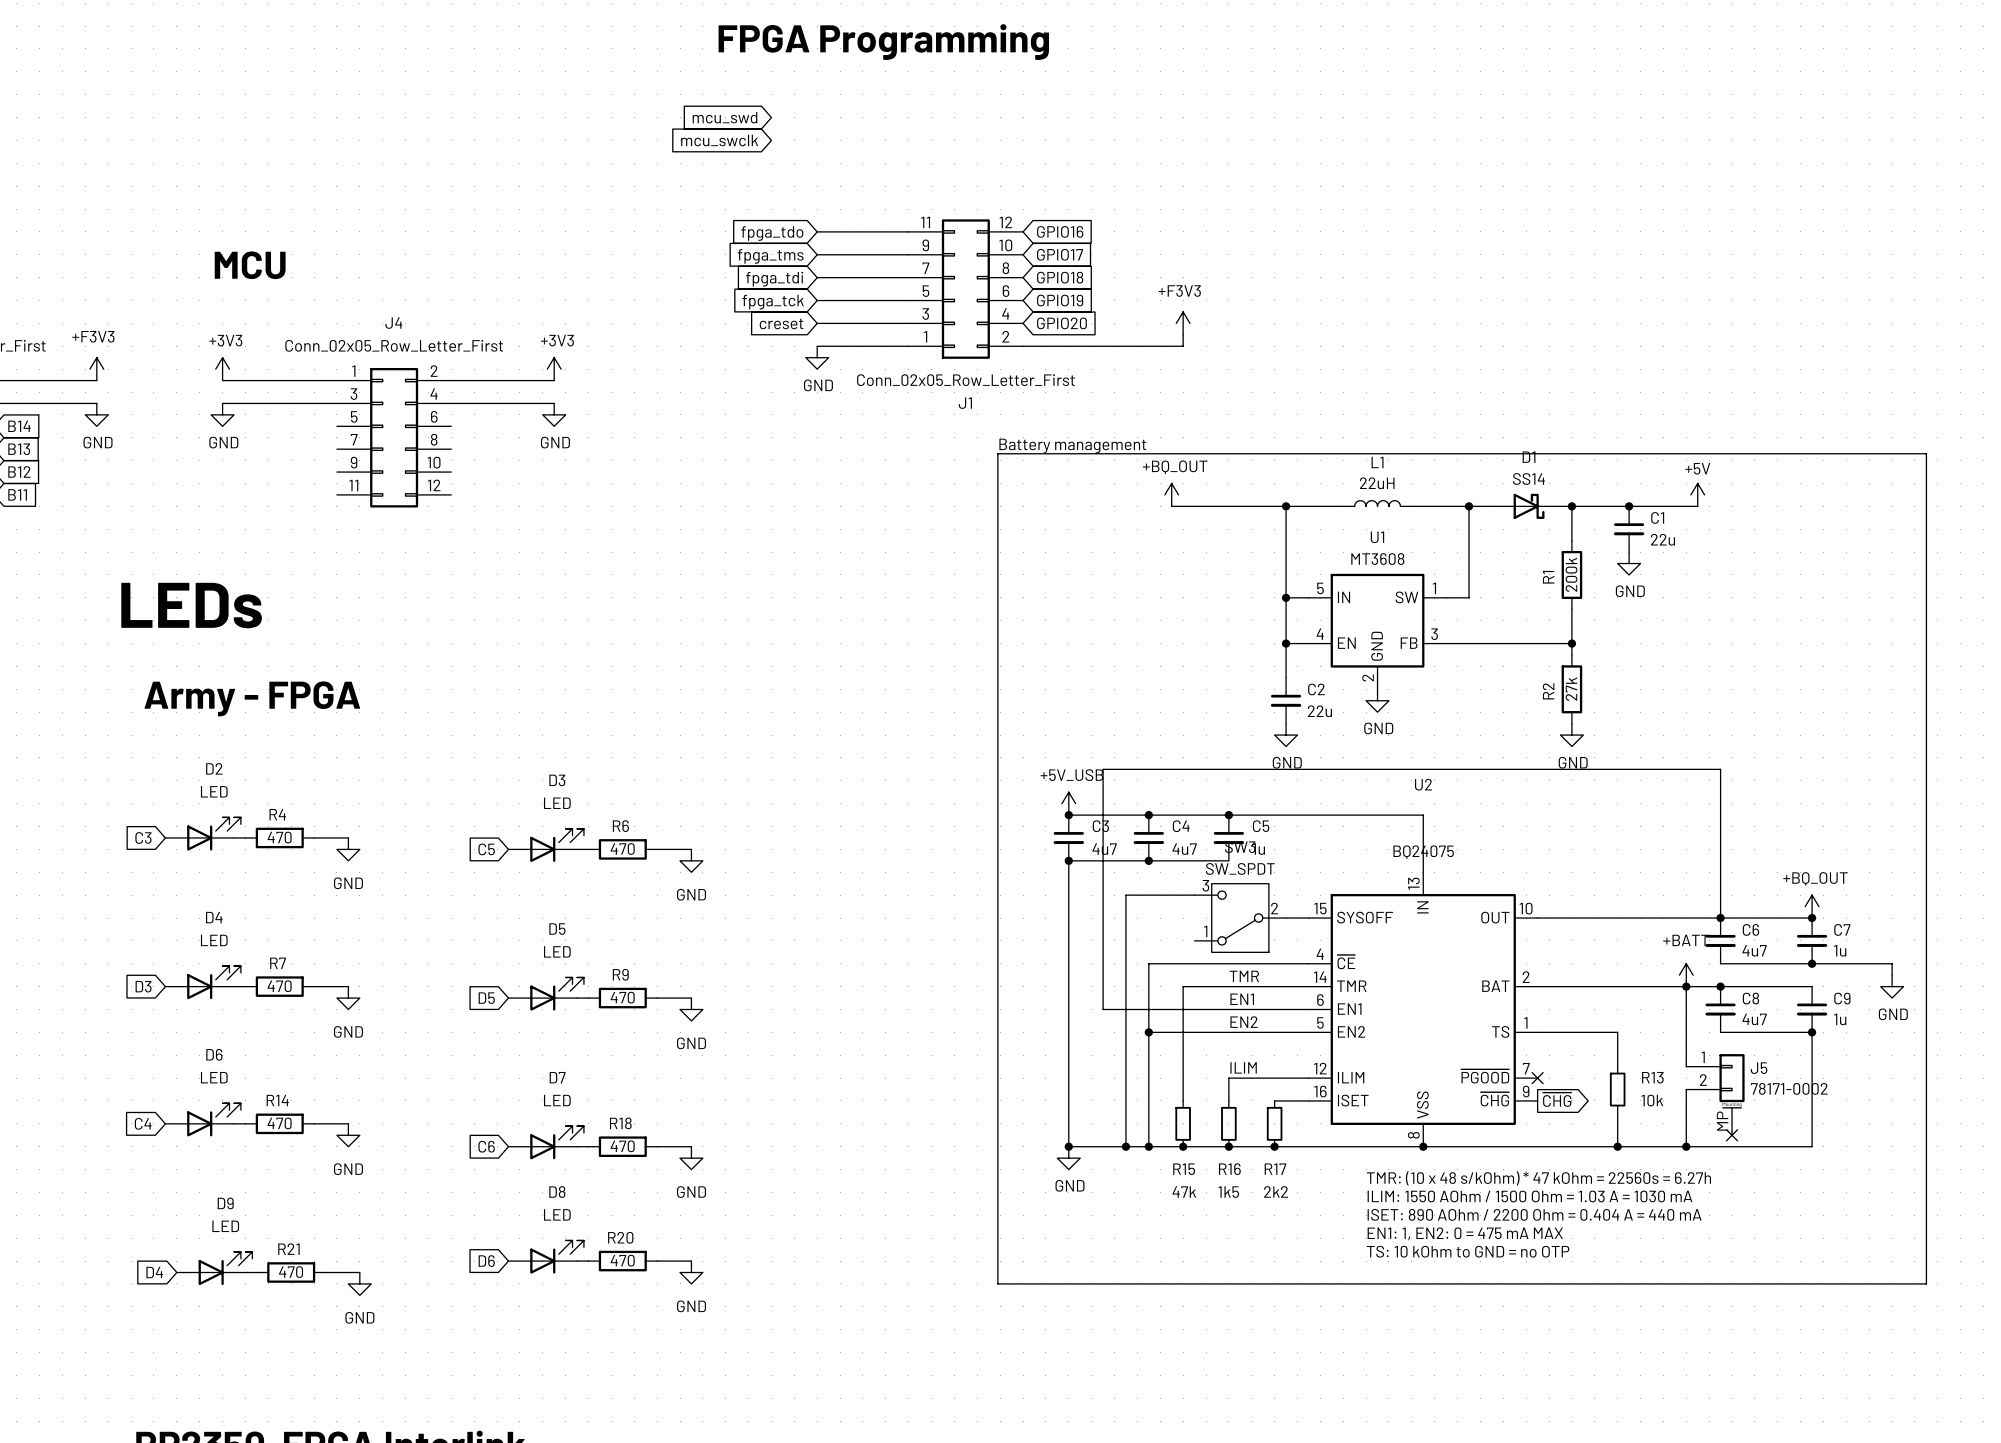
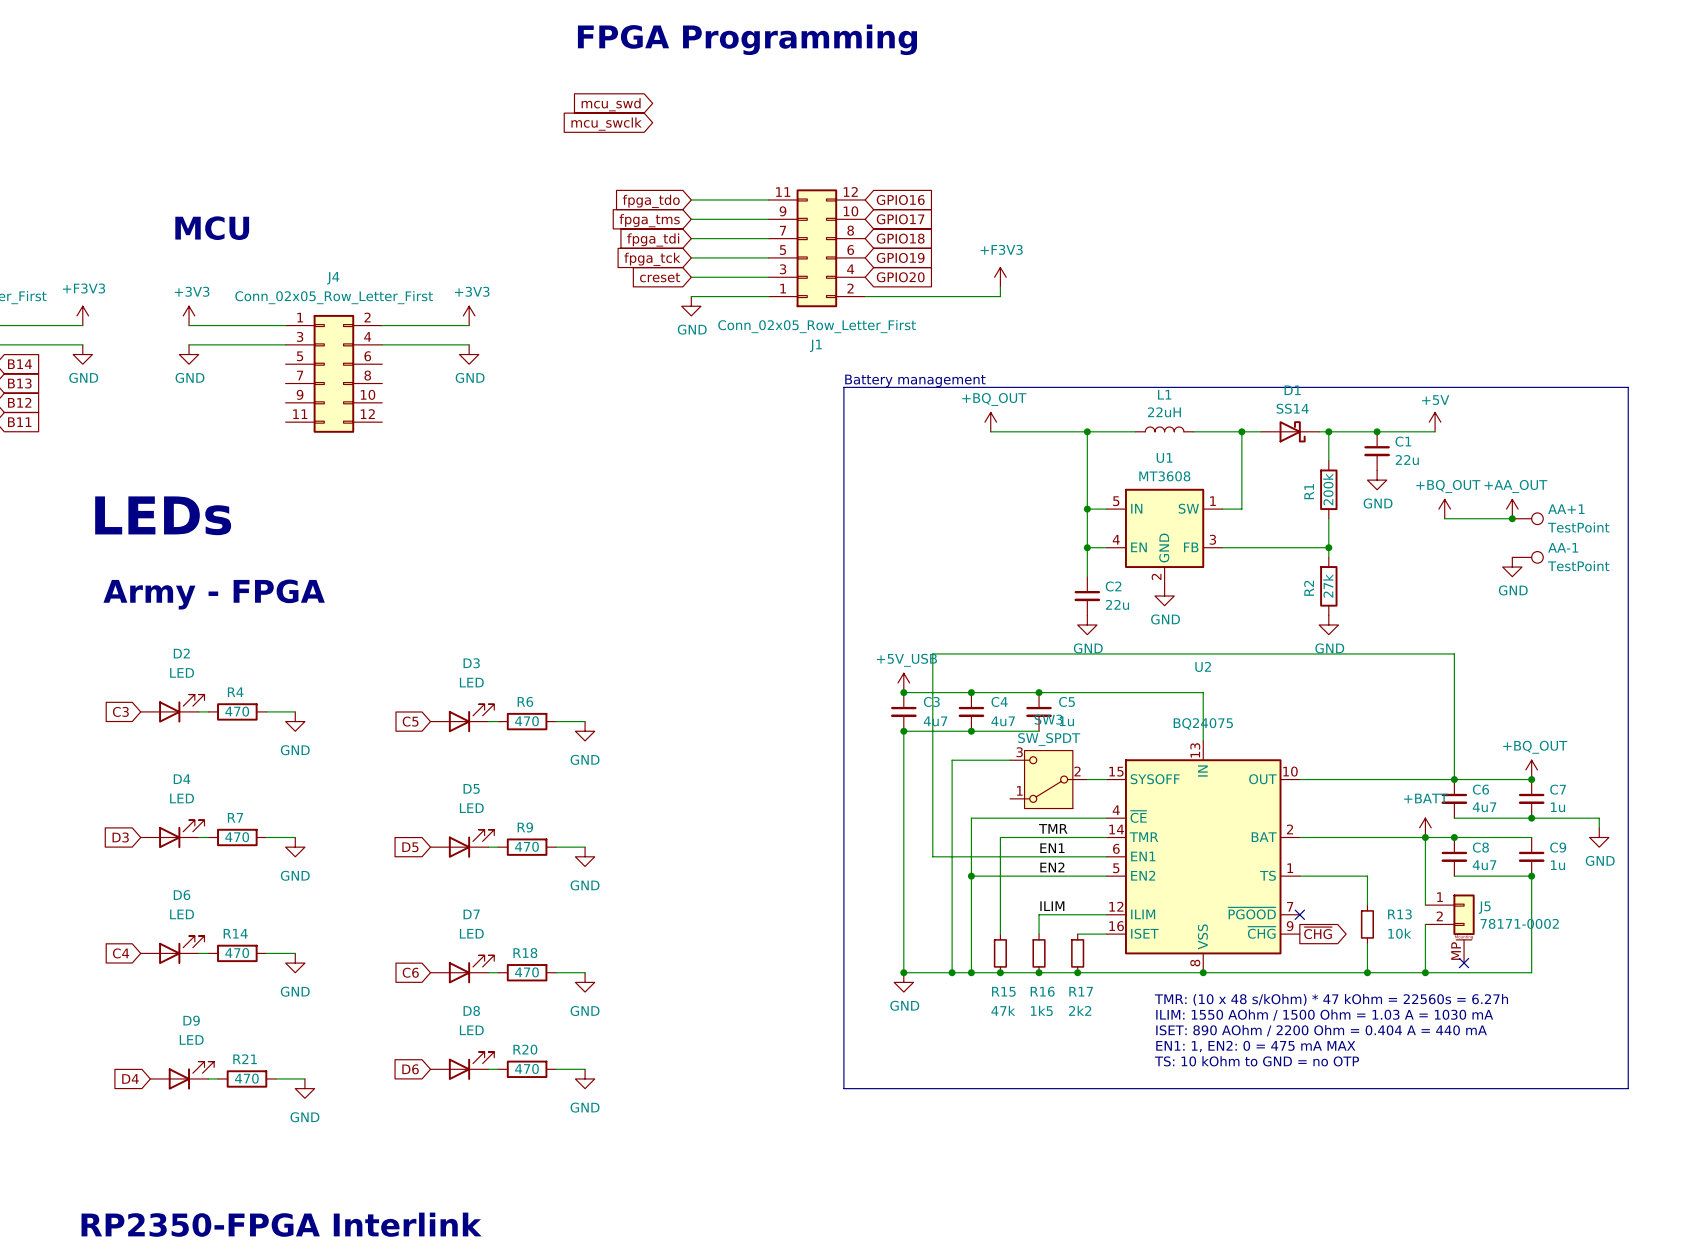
power symbol: none -> +BQ_OUT (1444, 509)
power symbol: none -> +AA_OUT (1512, 509)
wire: none -> (1444, 518) (1512, 518)
junction: none -> (1512, 518)
AA+1: none -> TestPoint (1527, 518)
AA-1: none -> TestPoint (1527, 557)
power symbol: none -> GND (1512, 567)

